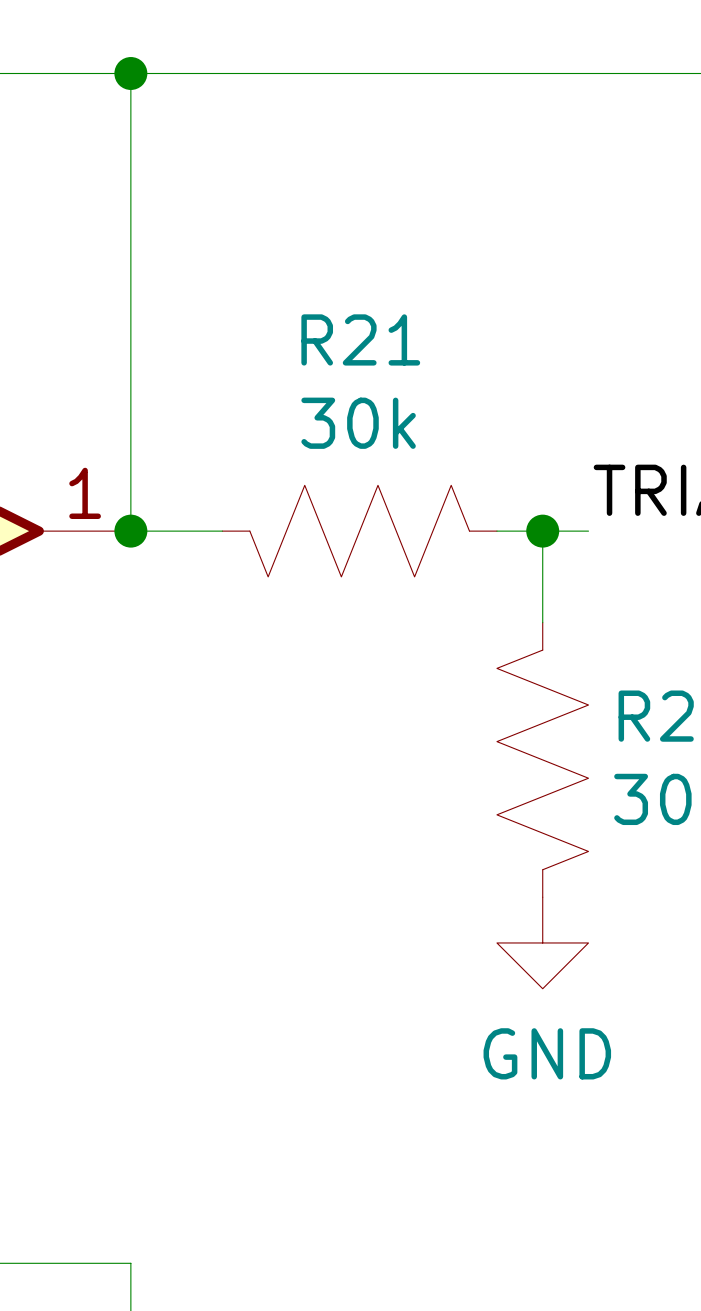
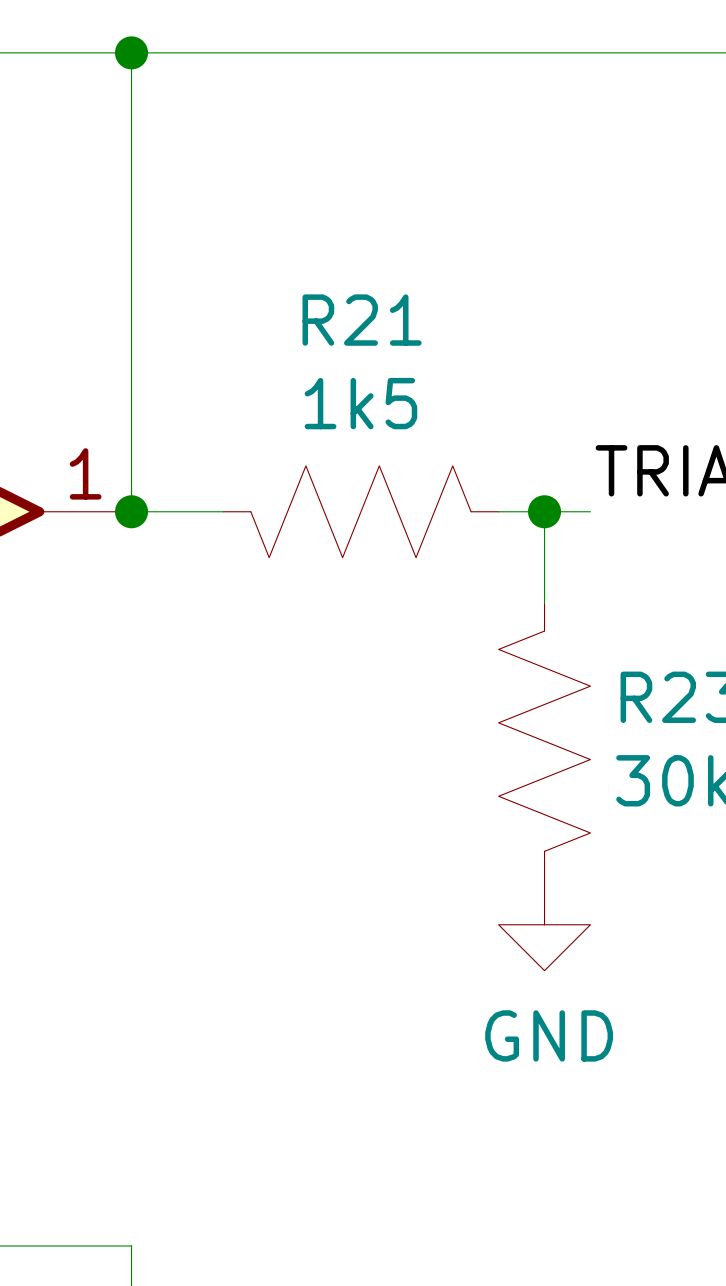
R21 value: 30k (358, 423) -> 1k5 (360, 403)

